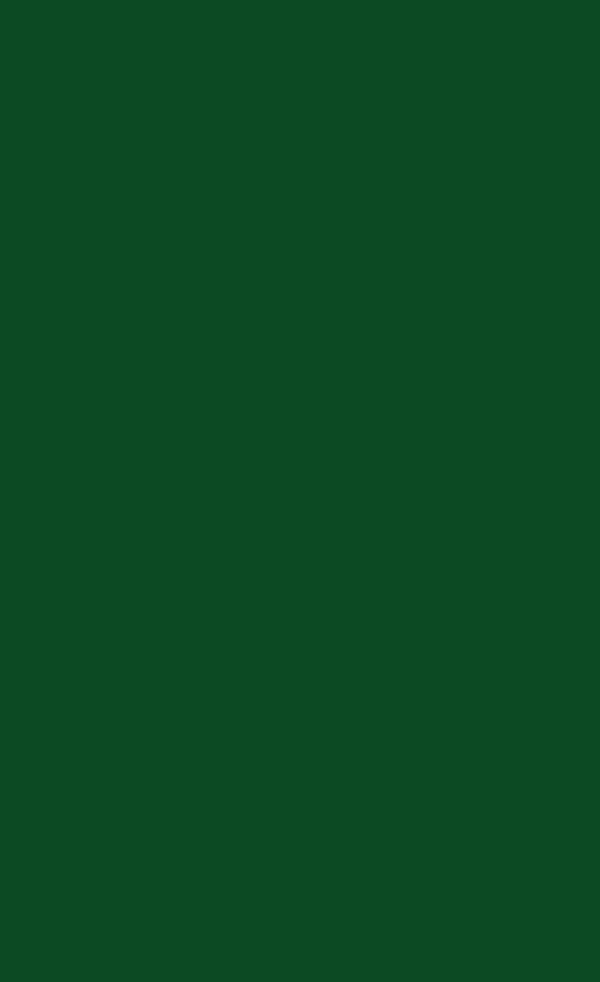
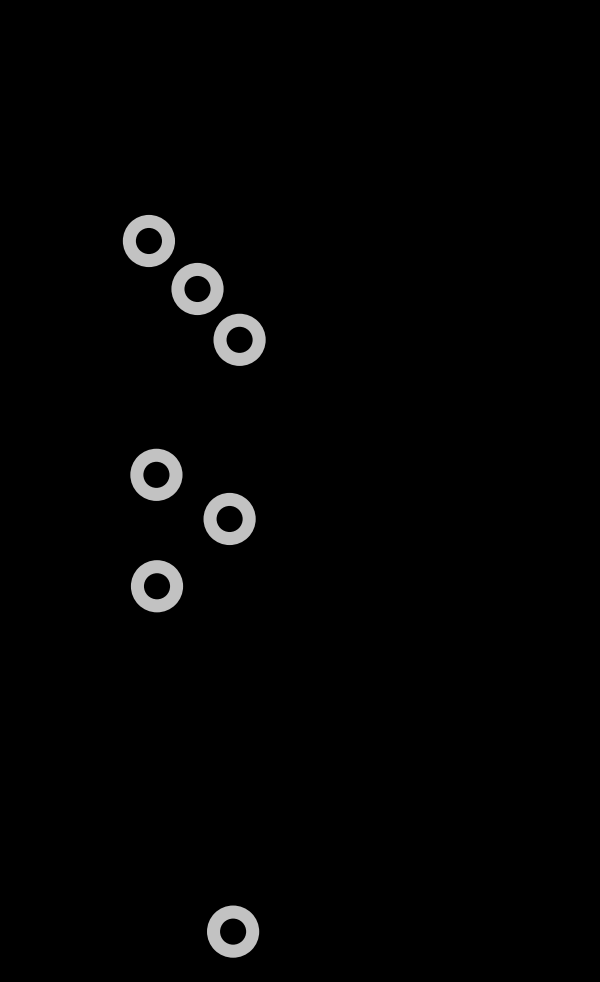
via: none -> (148, 241)
via: none -> (197, 288)
via: none -> (239, 339)
via: none -> (156, 474)
via: none -> (229, 518)
via: none -> (157, 586)
via: none -> (233, 931)

